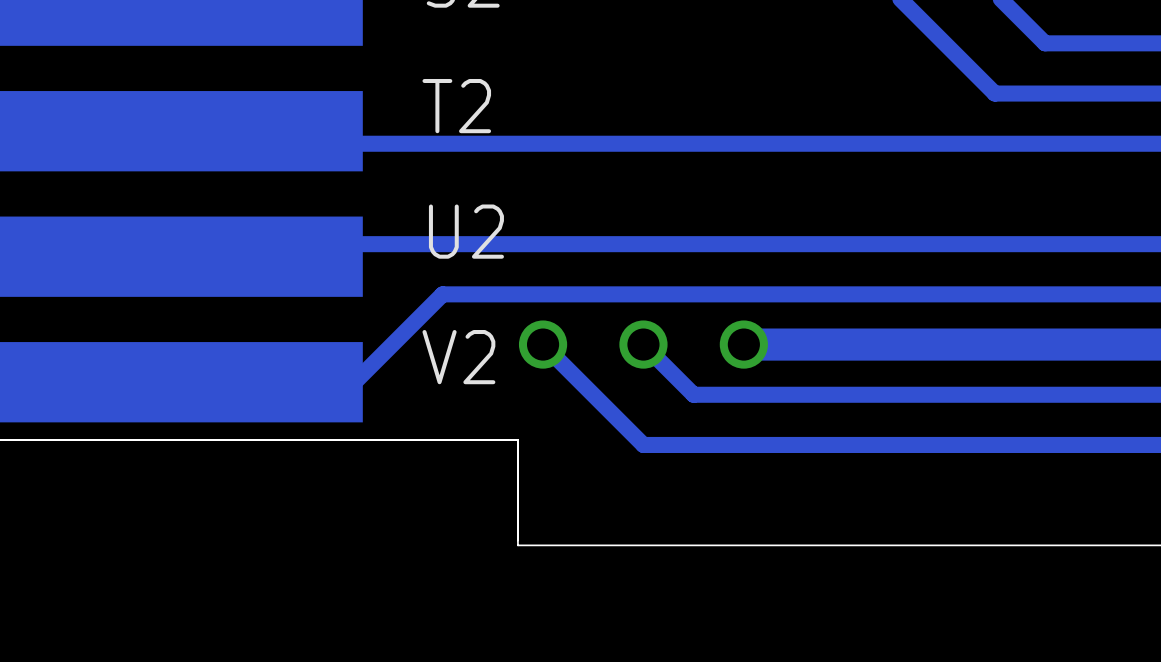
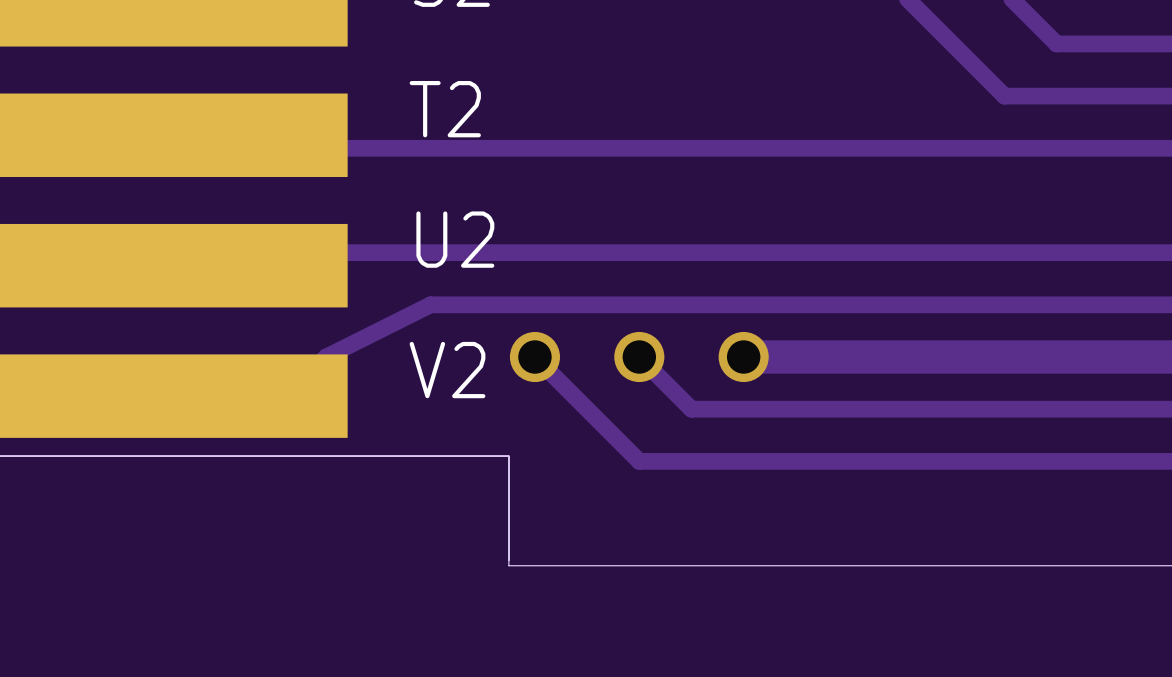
track: (442, 294) (342, 394) (307, 379) -> (430, 304) (326, 357) (290, 393)

